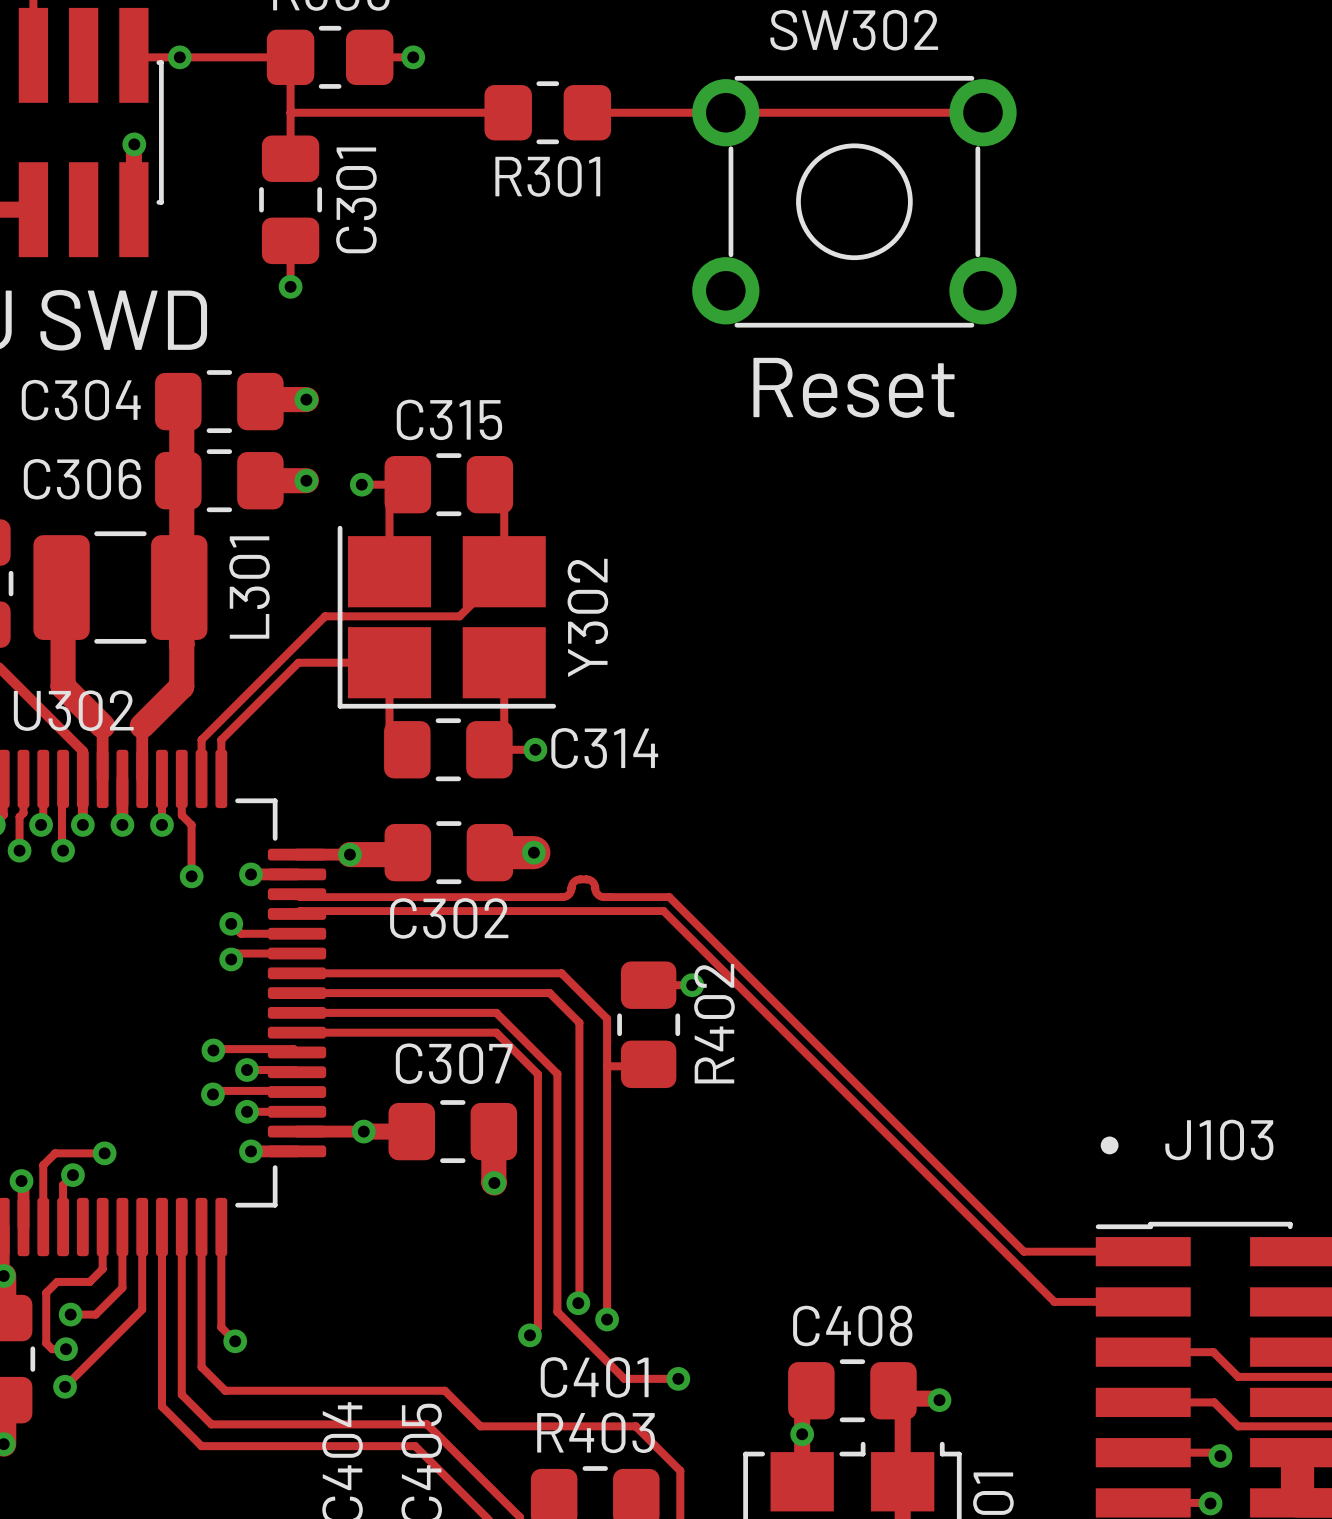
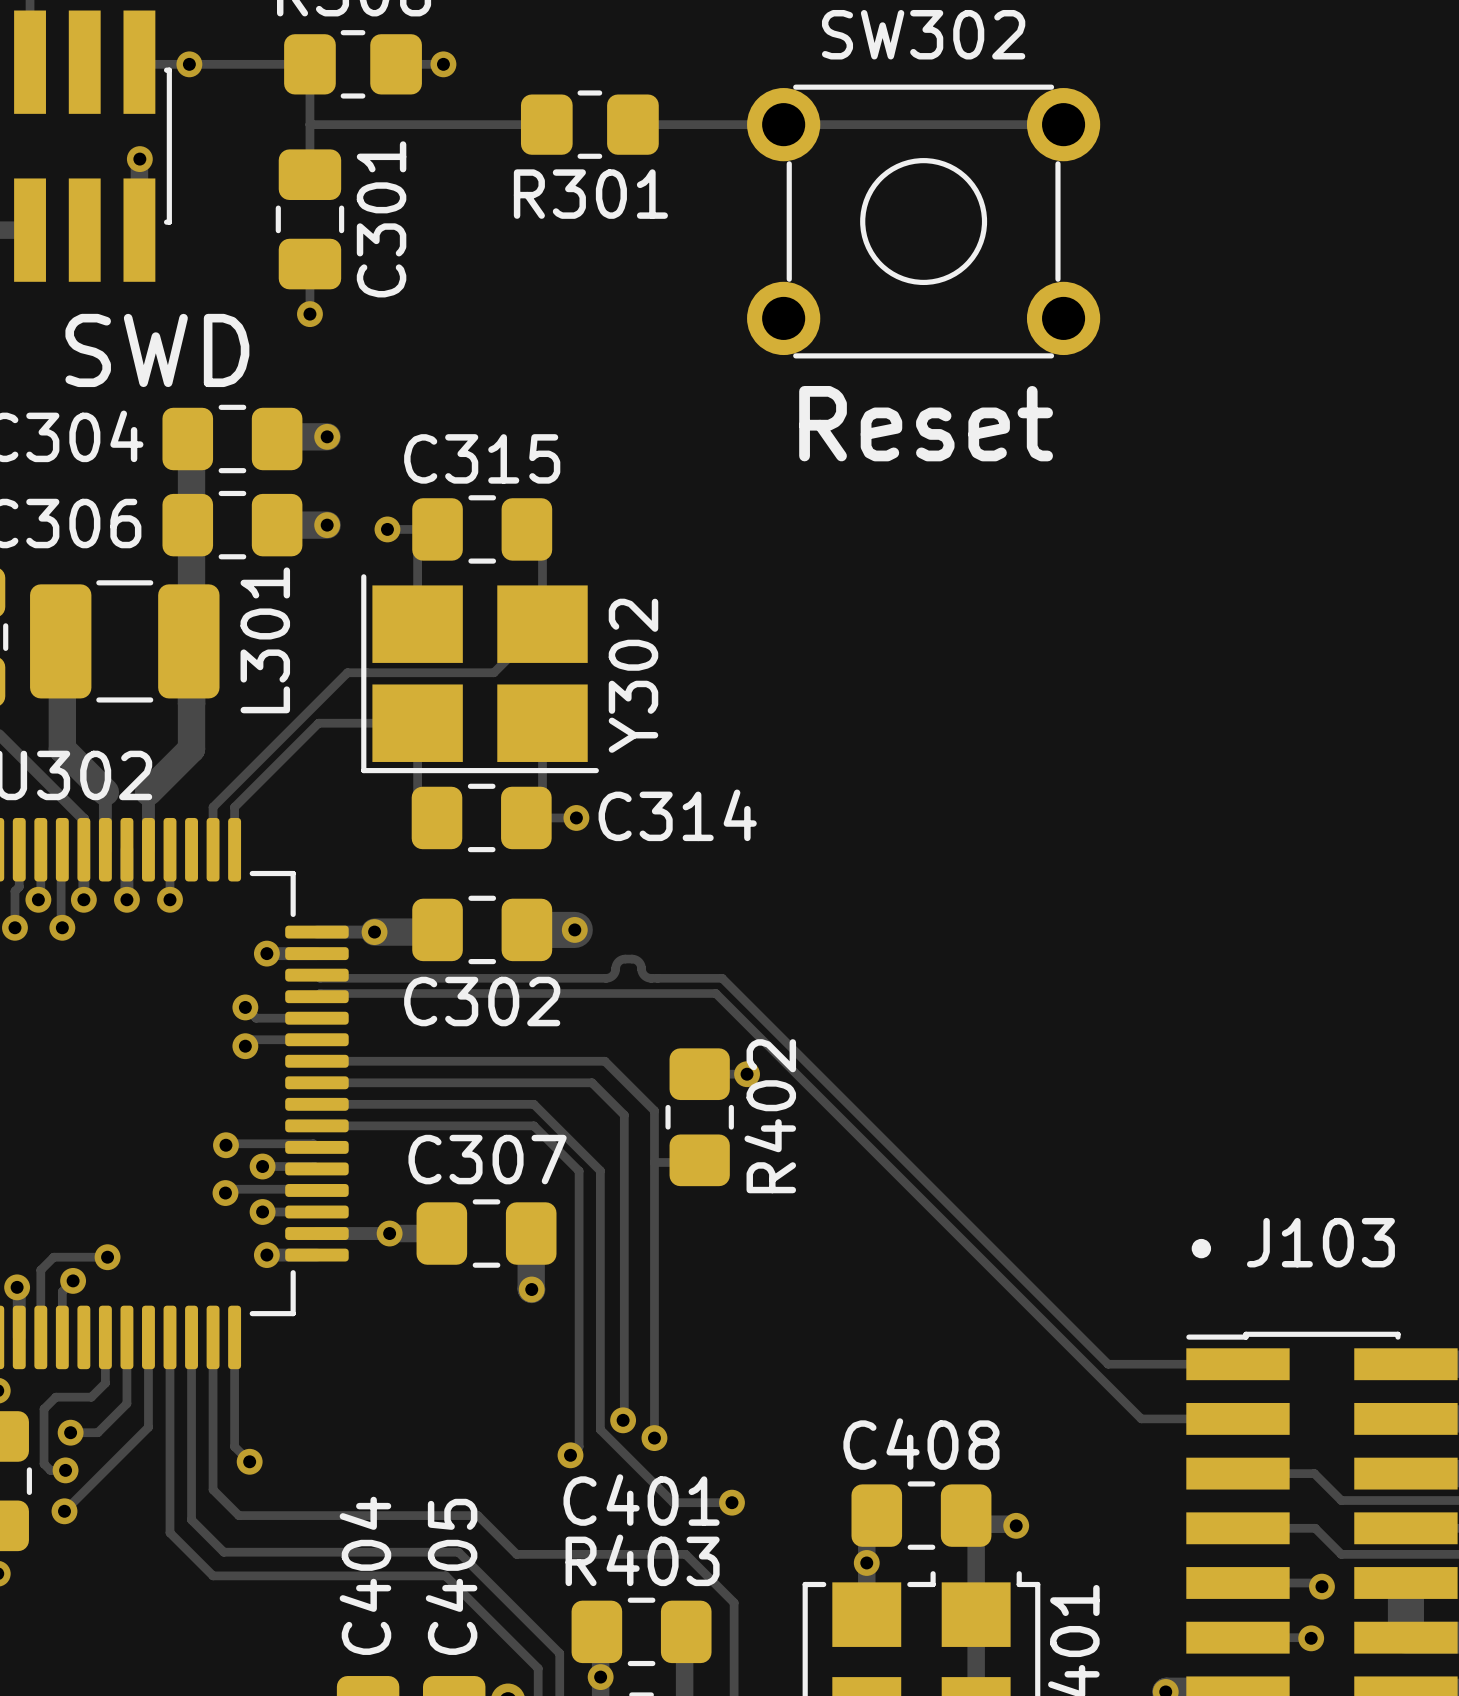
track: (181, 778) (181, 815) (191, 824) (191, 876) -> none
via: (191, 876) -> none

